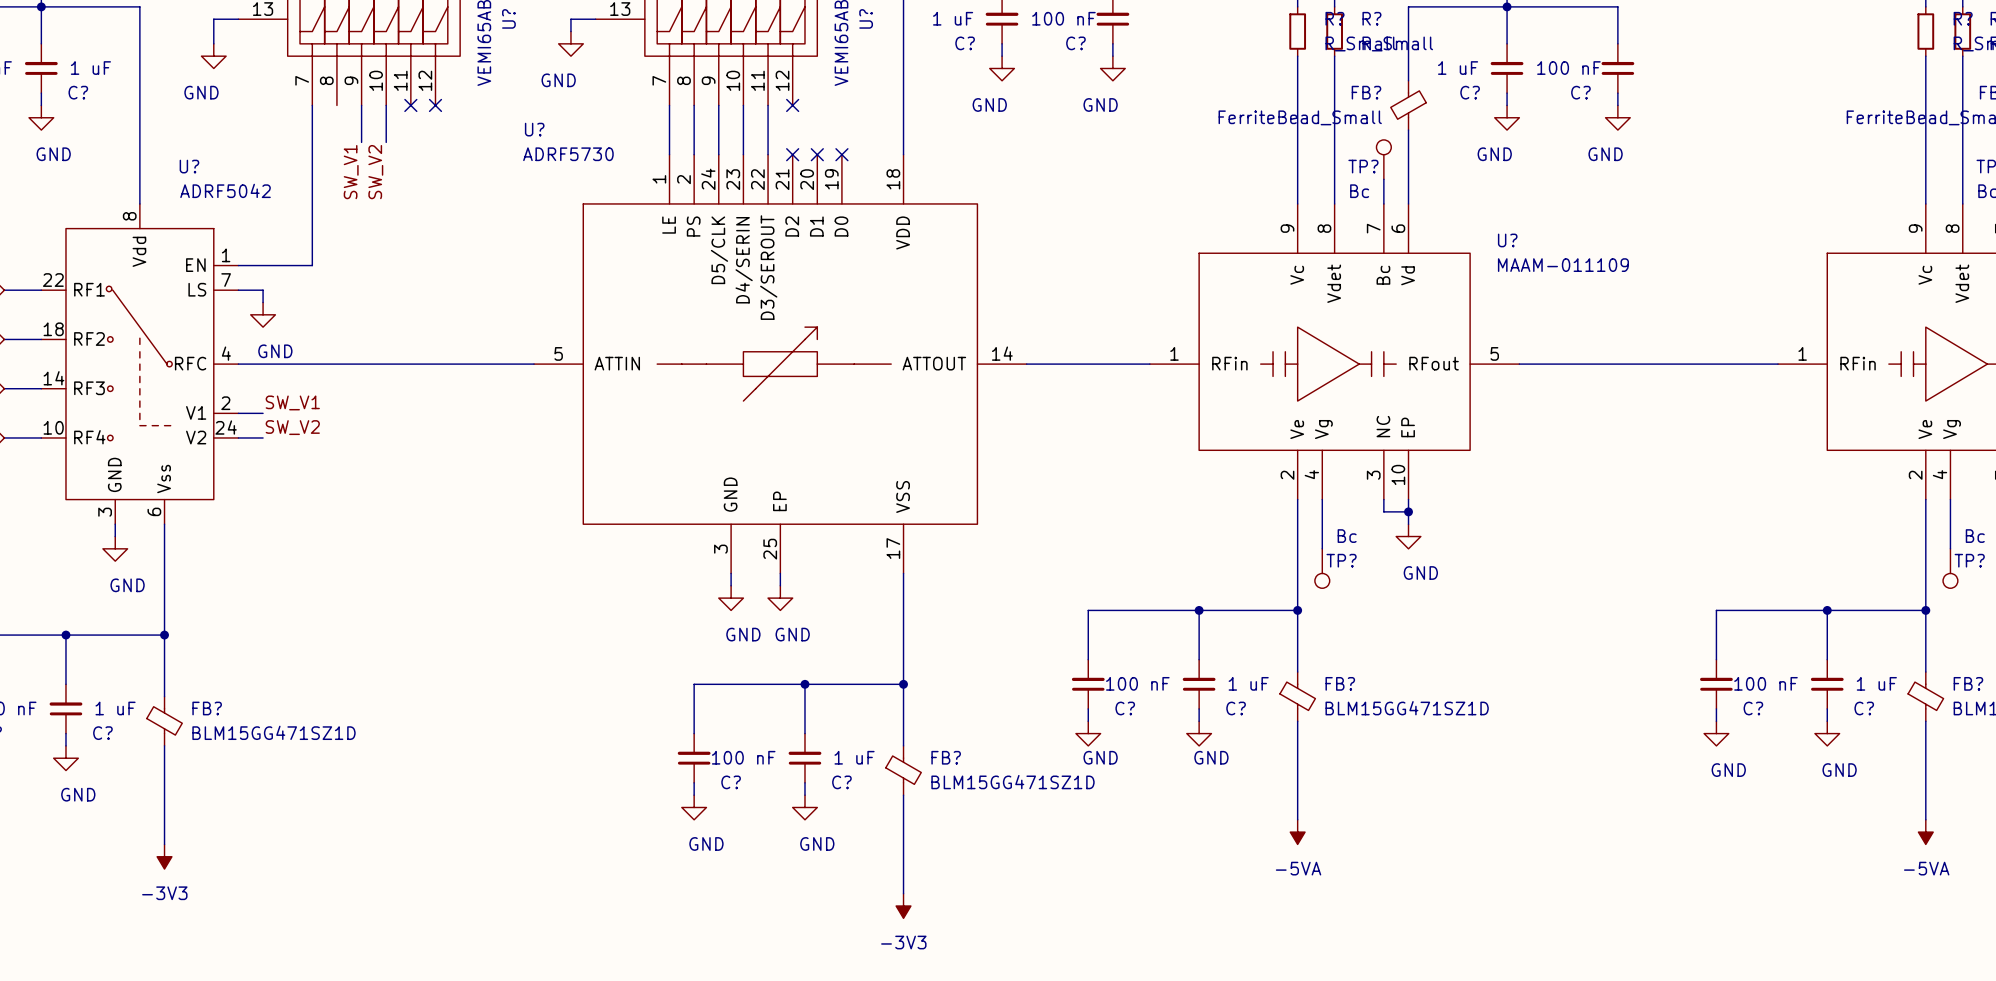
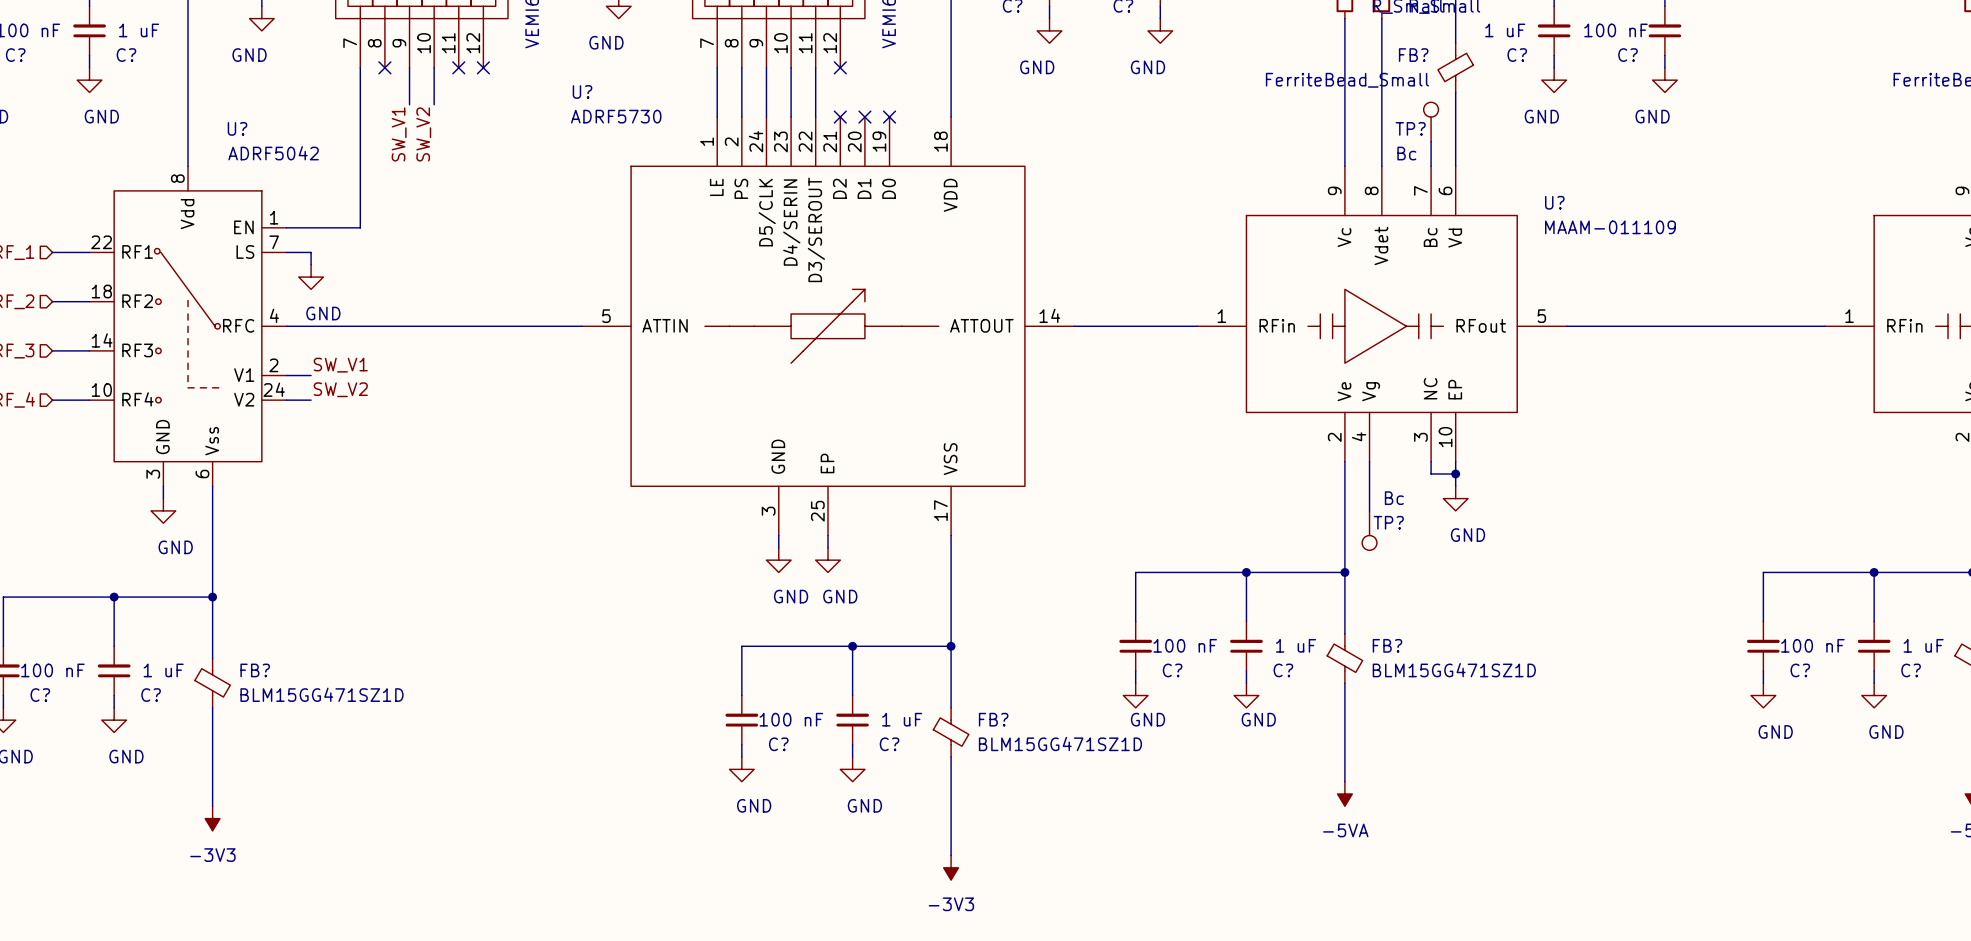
no-connect mark: none -> (384, 67)

